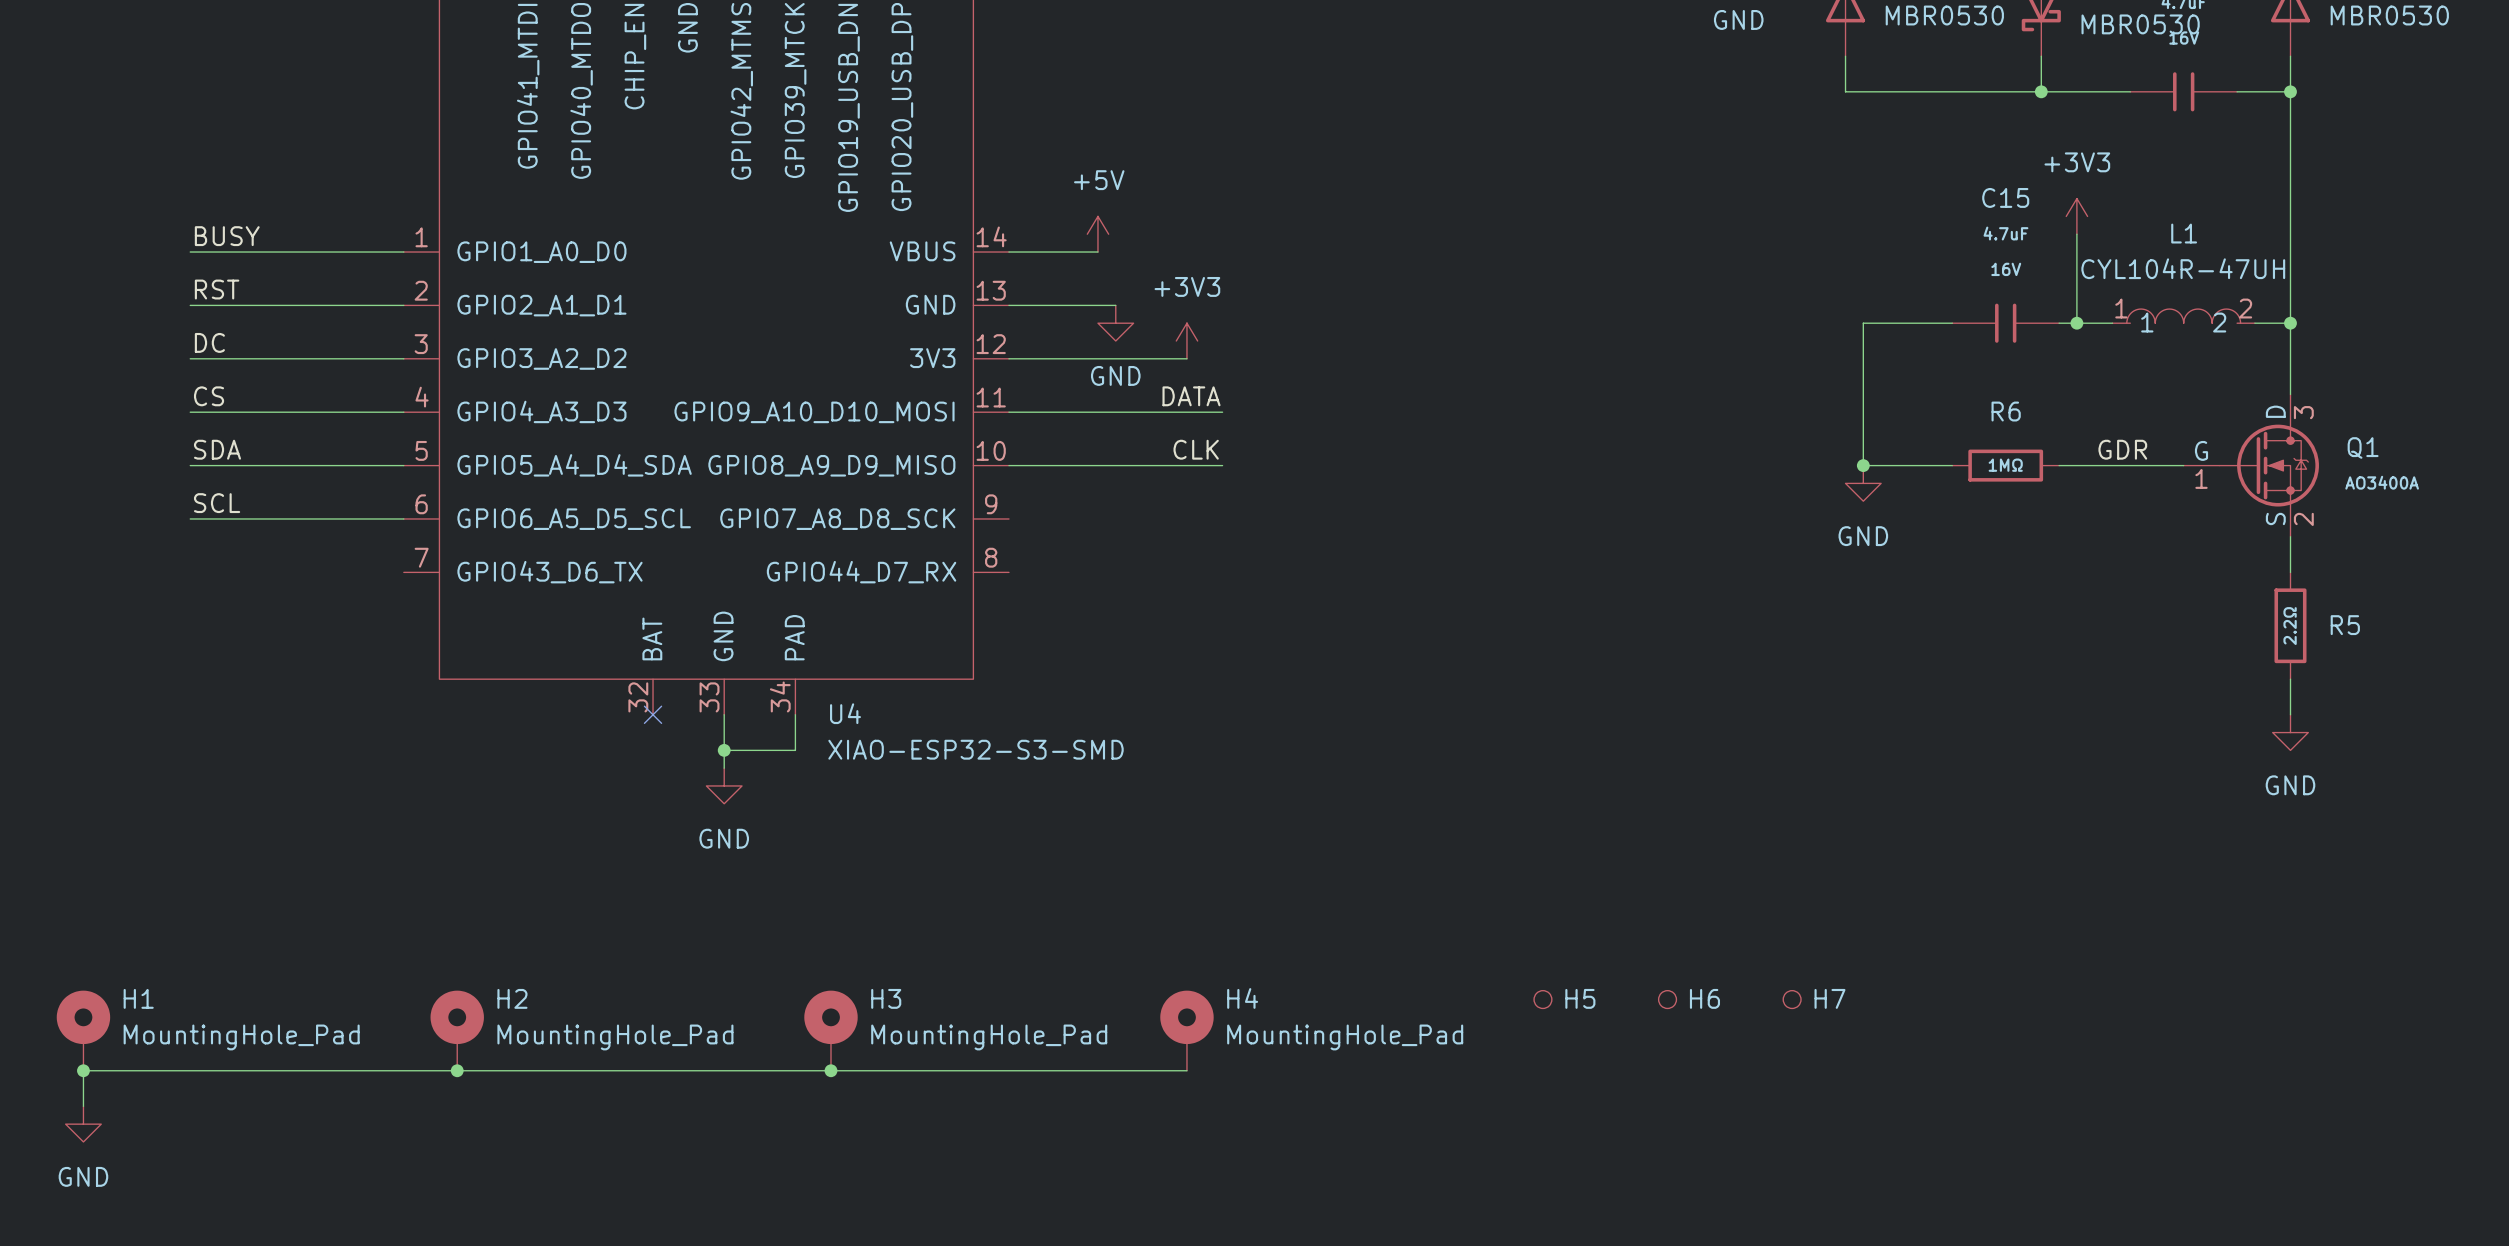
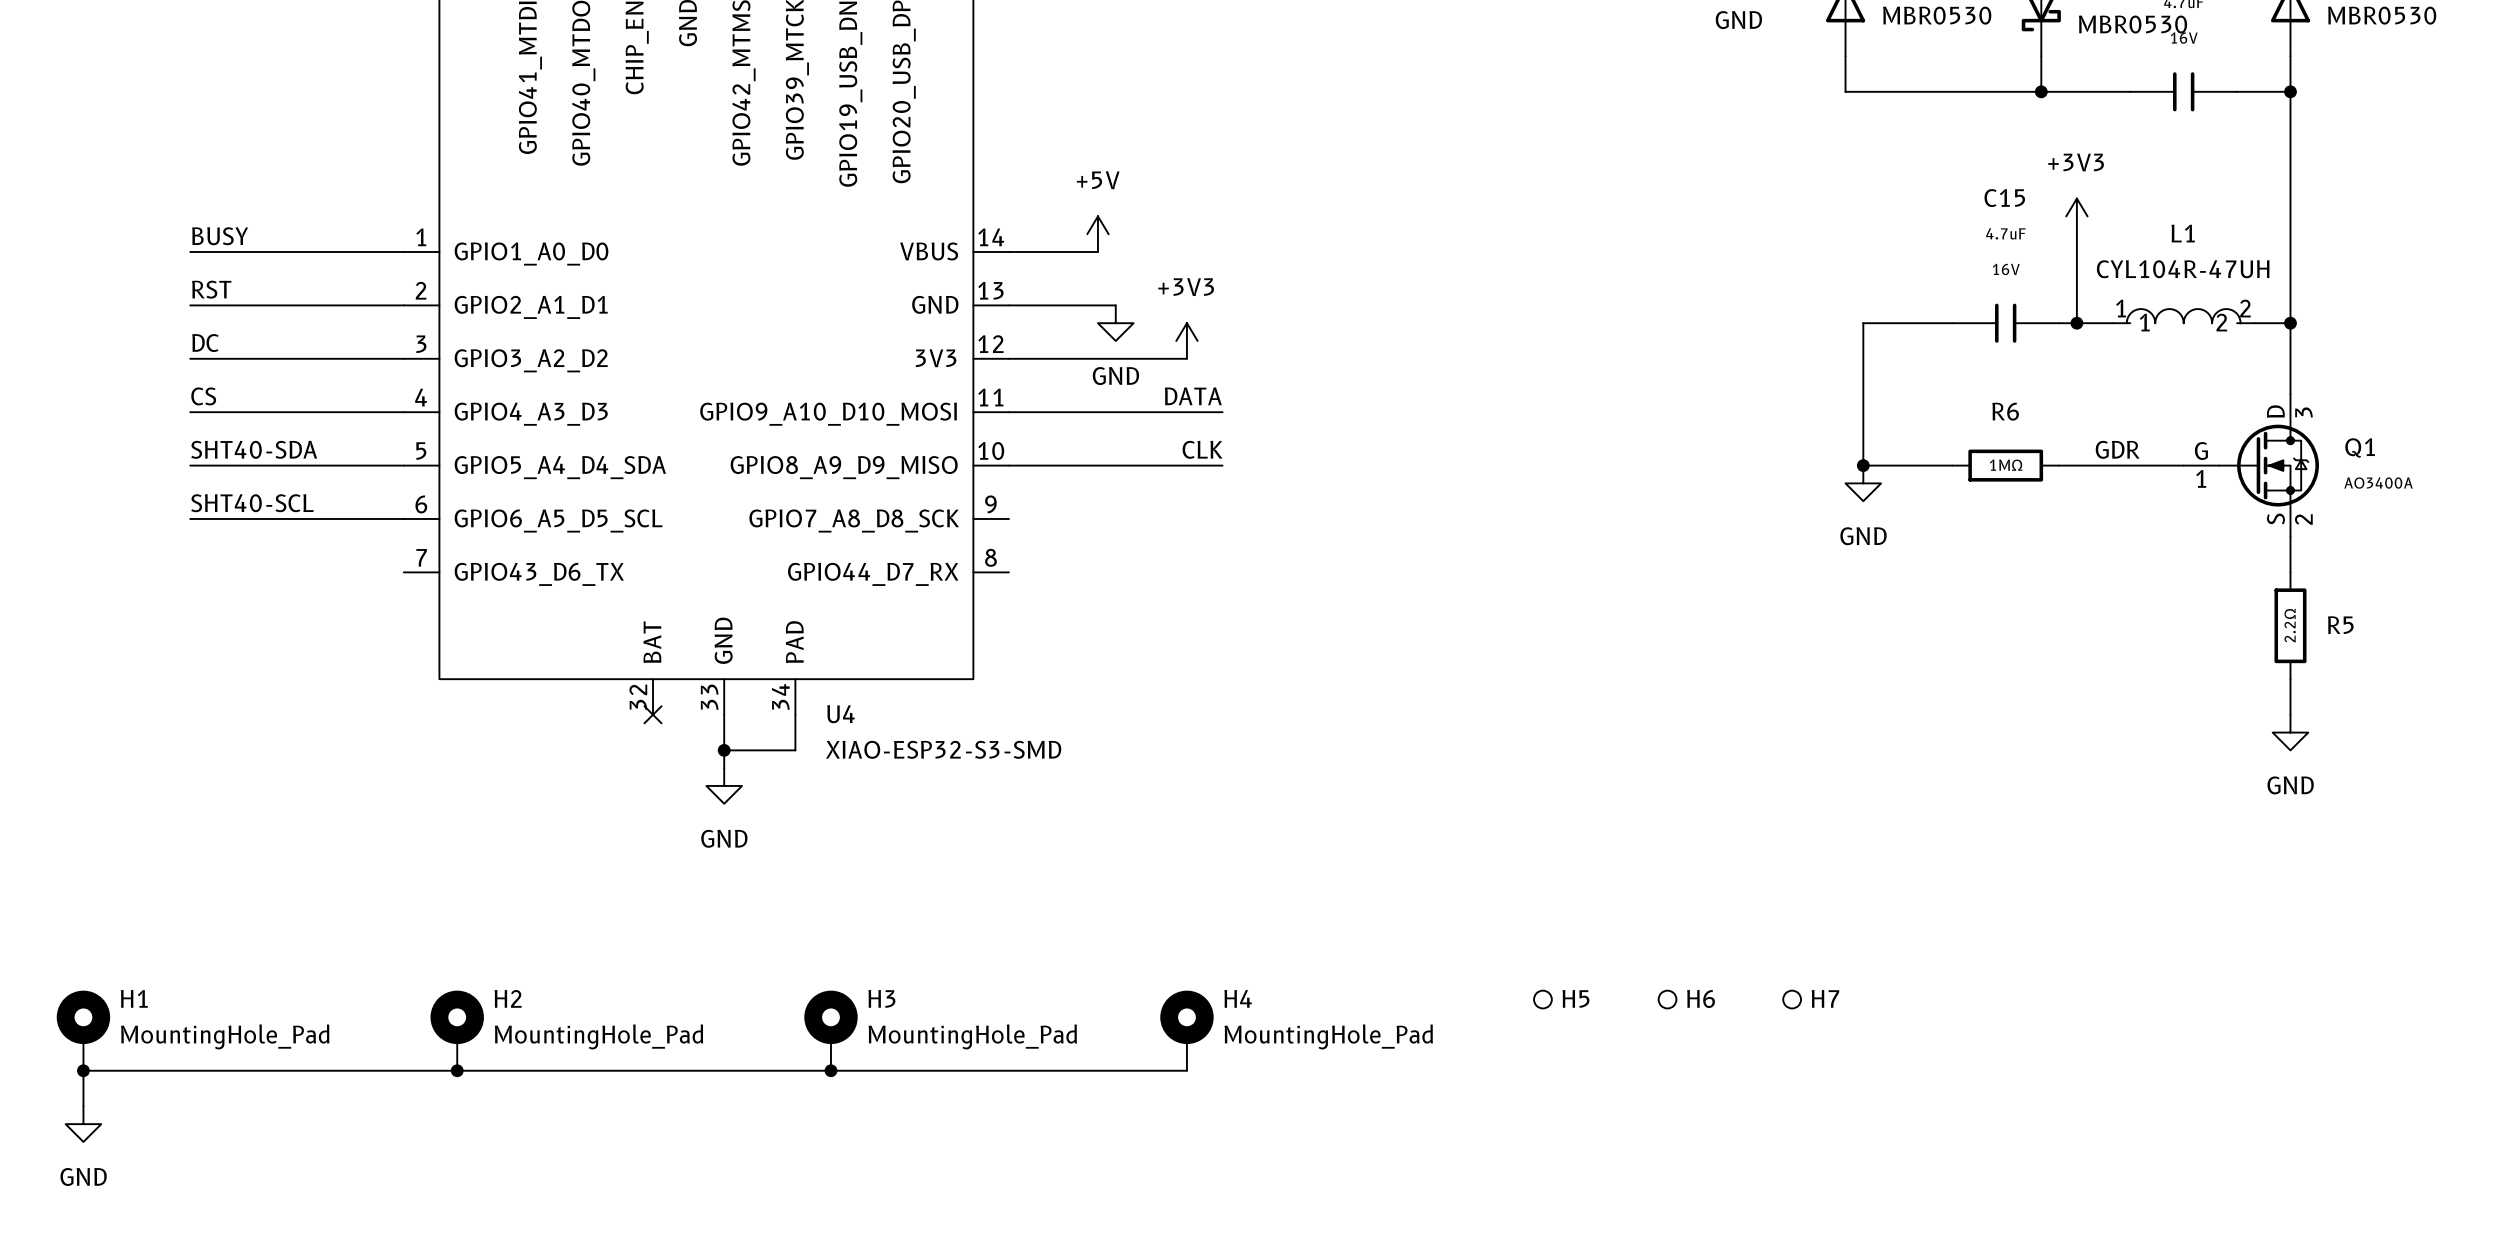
label: SDA (217, 449) -> SHT40-SDA (254, 449)
label: SCL (217, 503) -> SHT40-SCL (252, 503)

